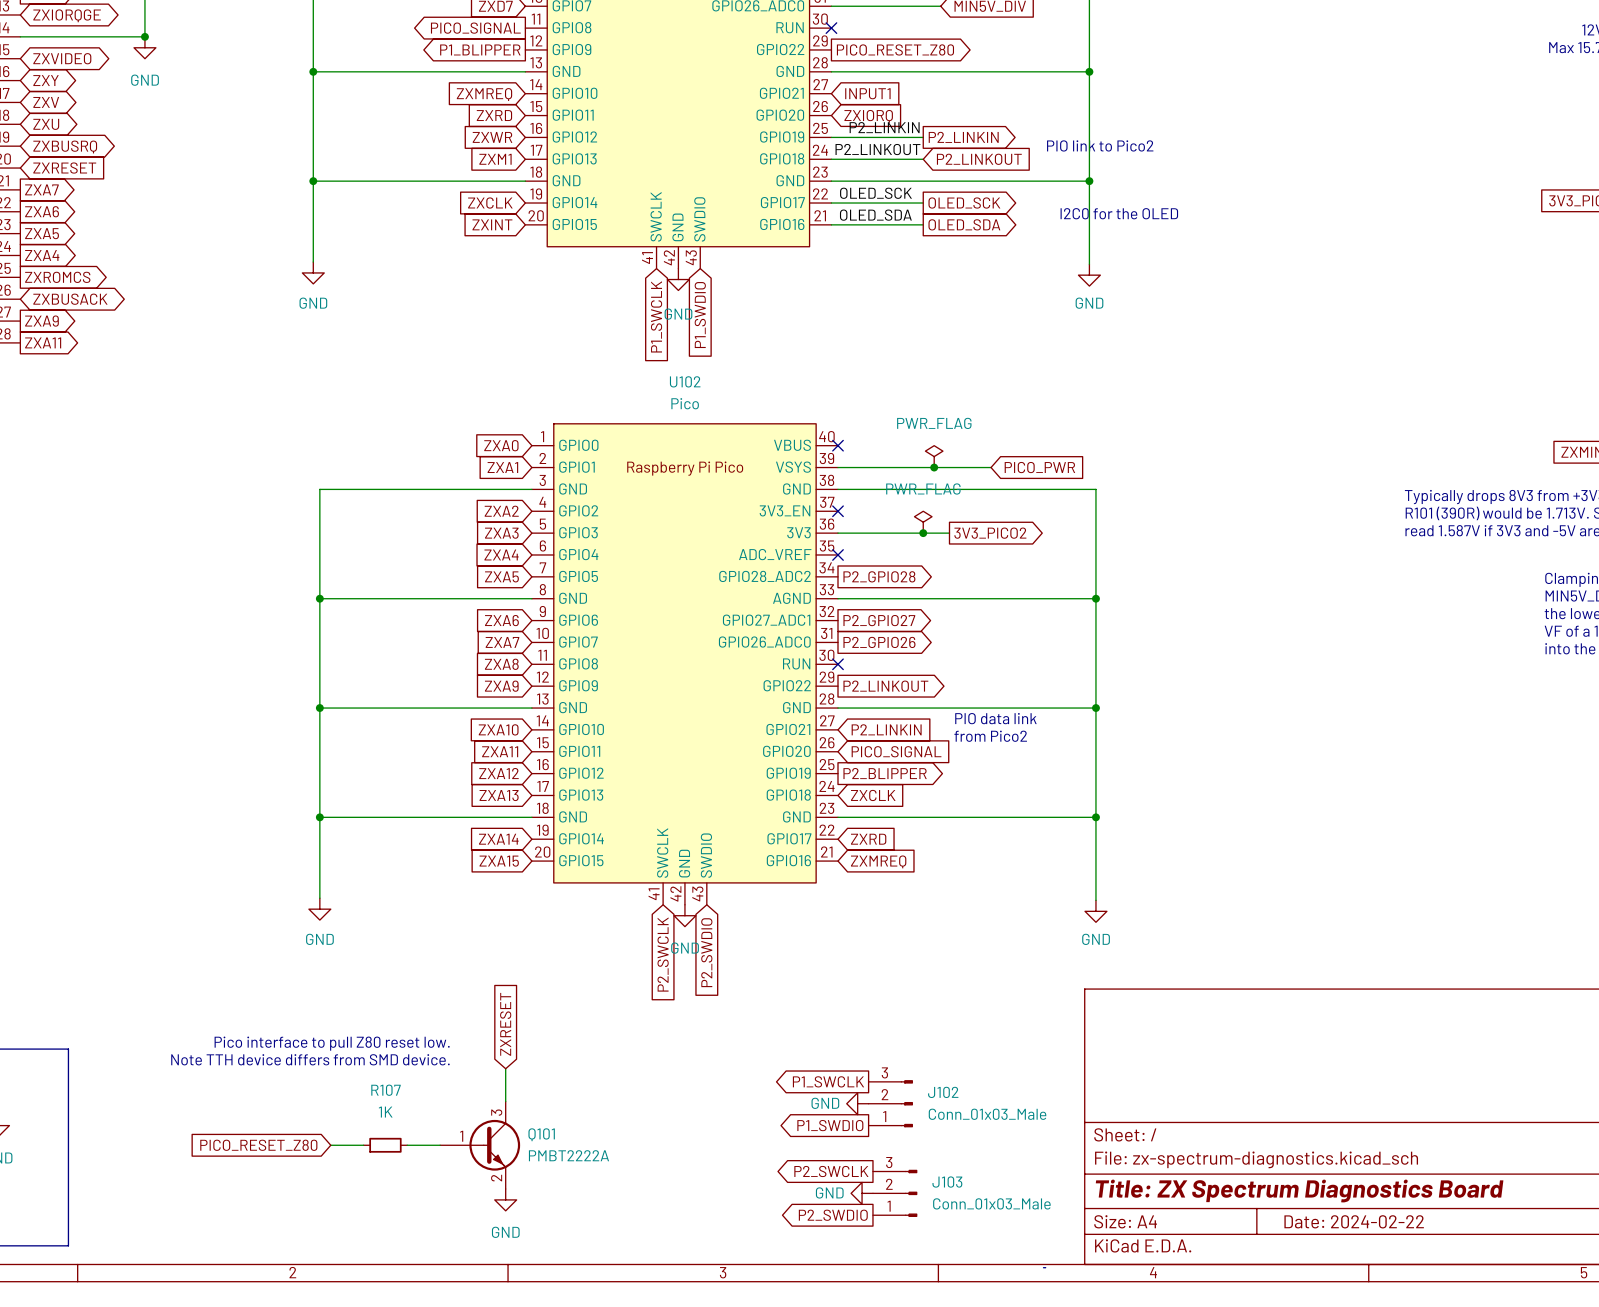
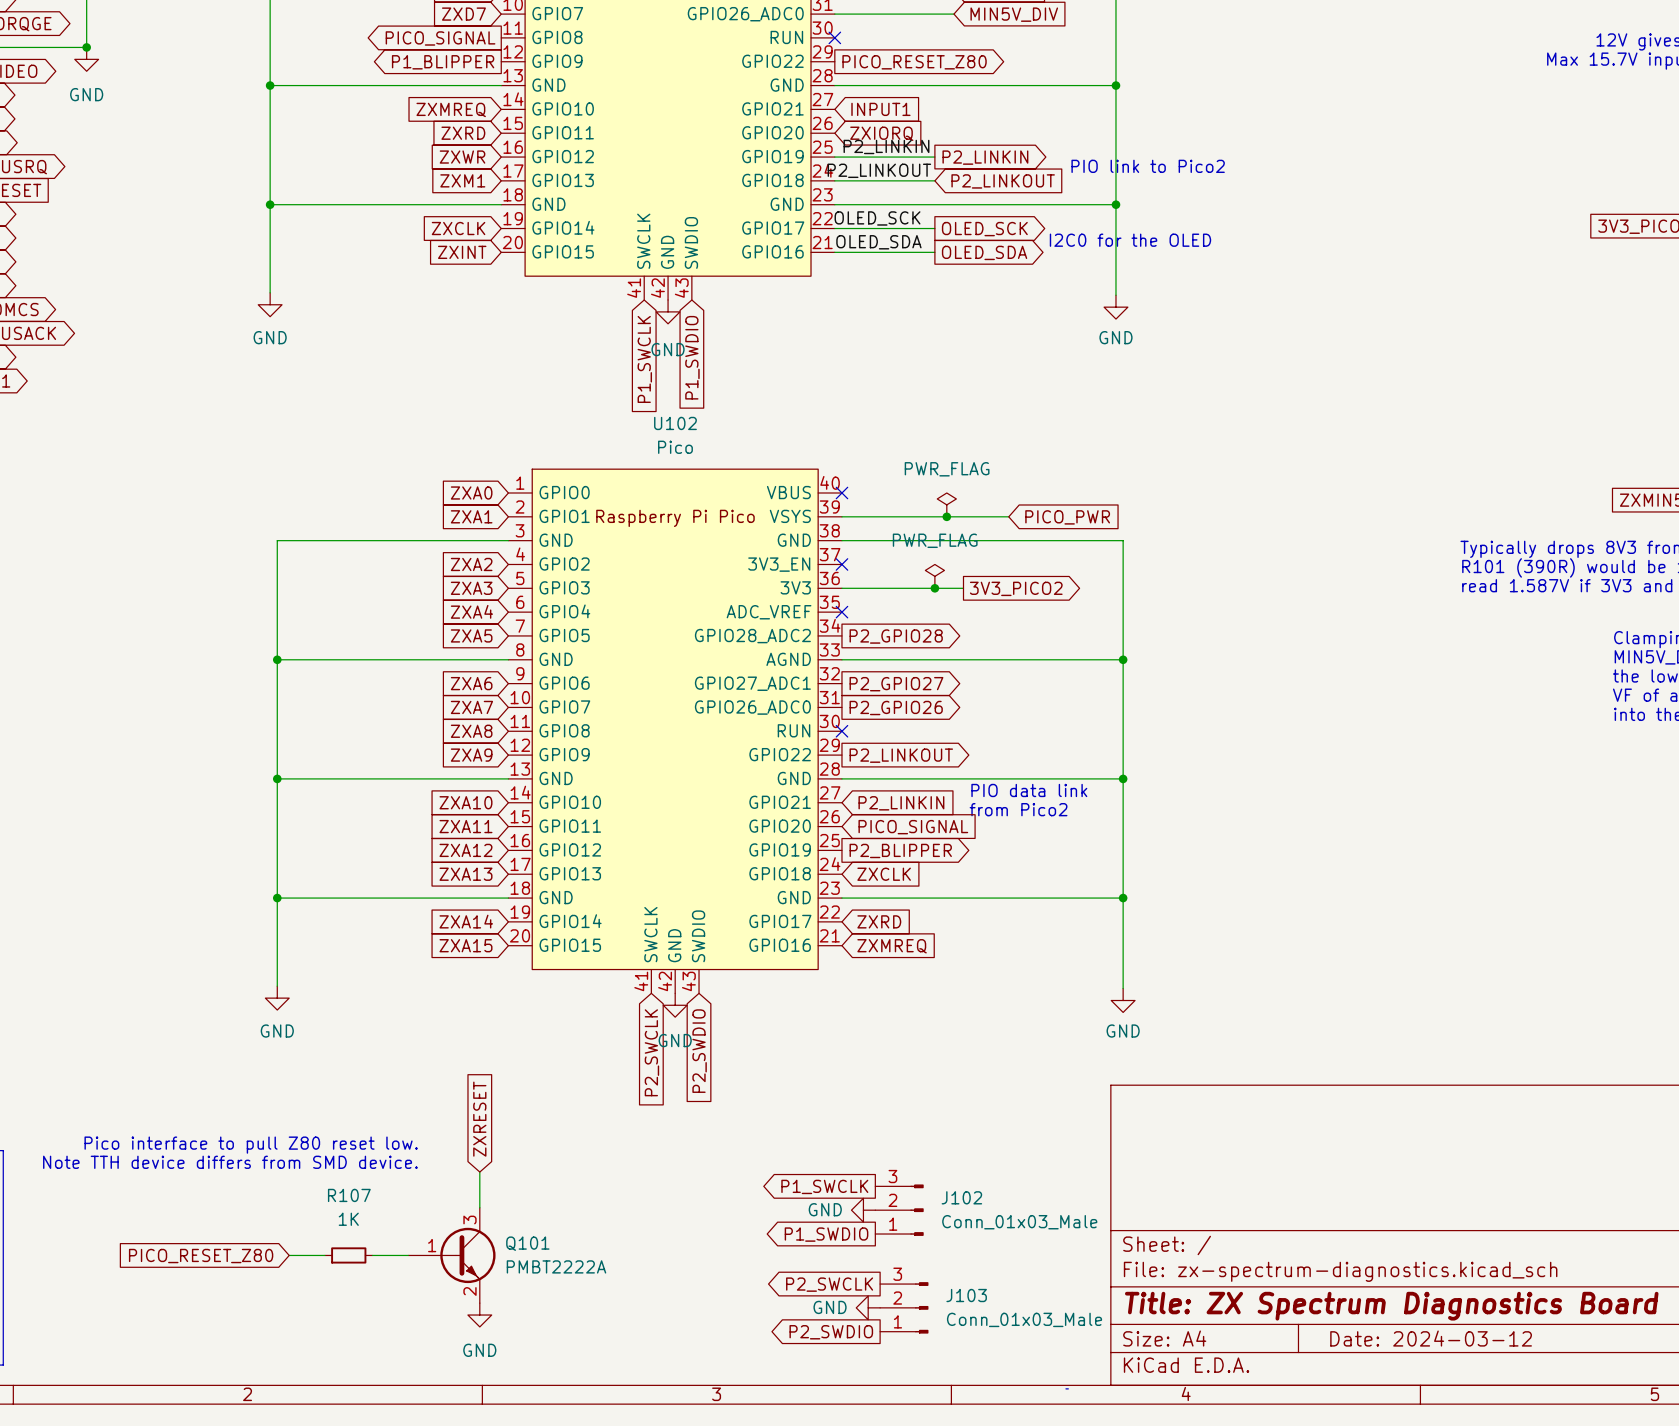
title block: Date: 2024-02-22 (1354, 1221) -> Date: 2024-03-12 (1431, 1338)

